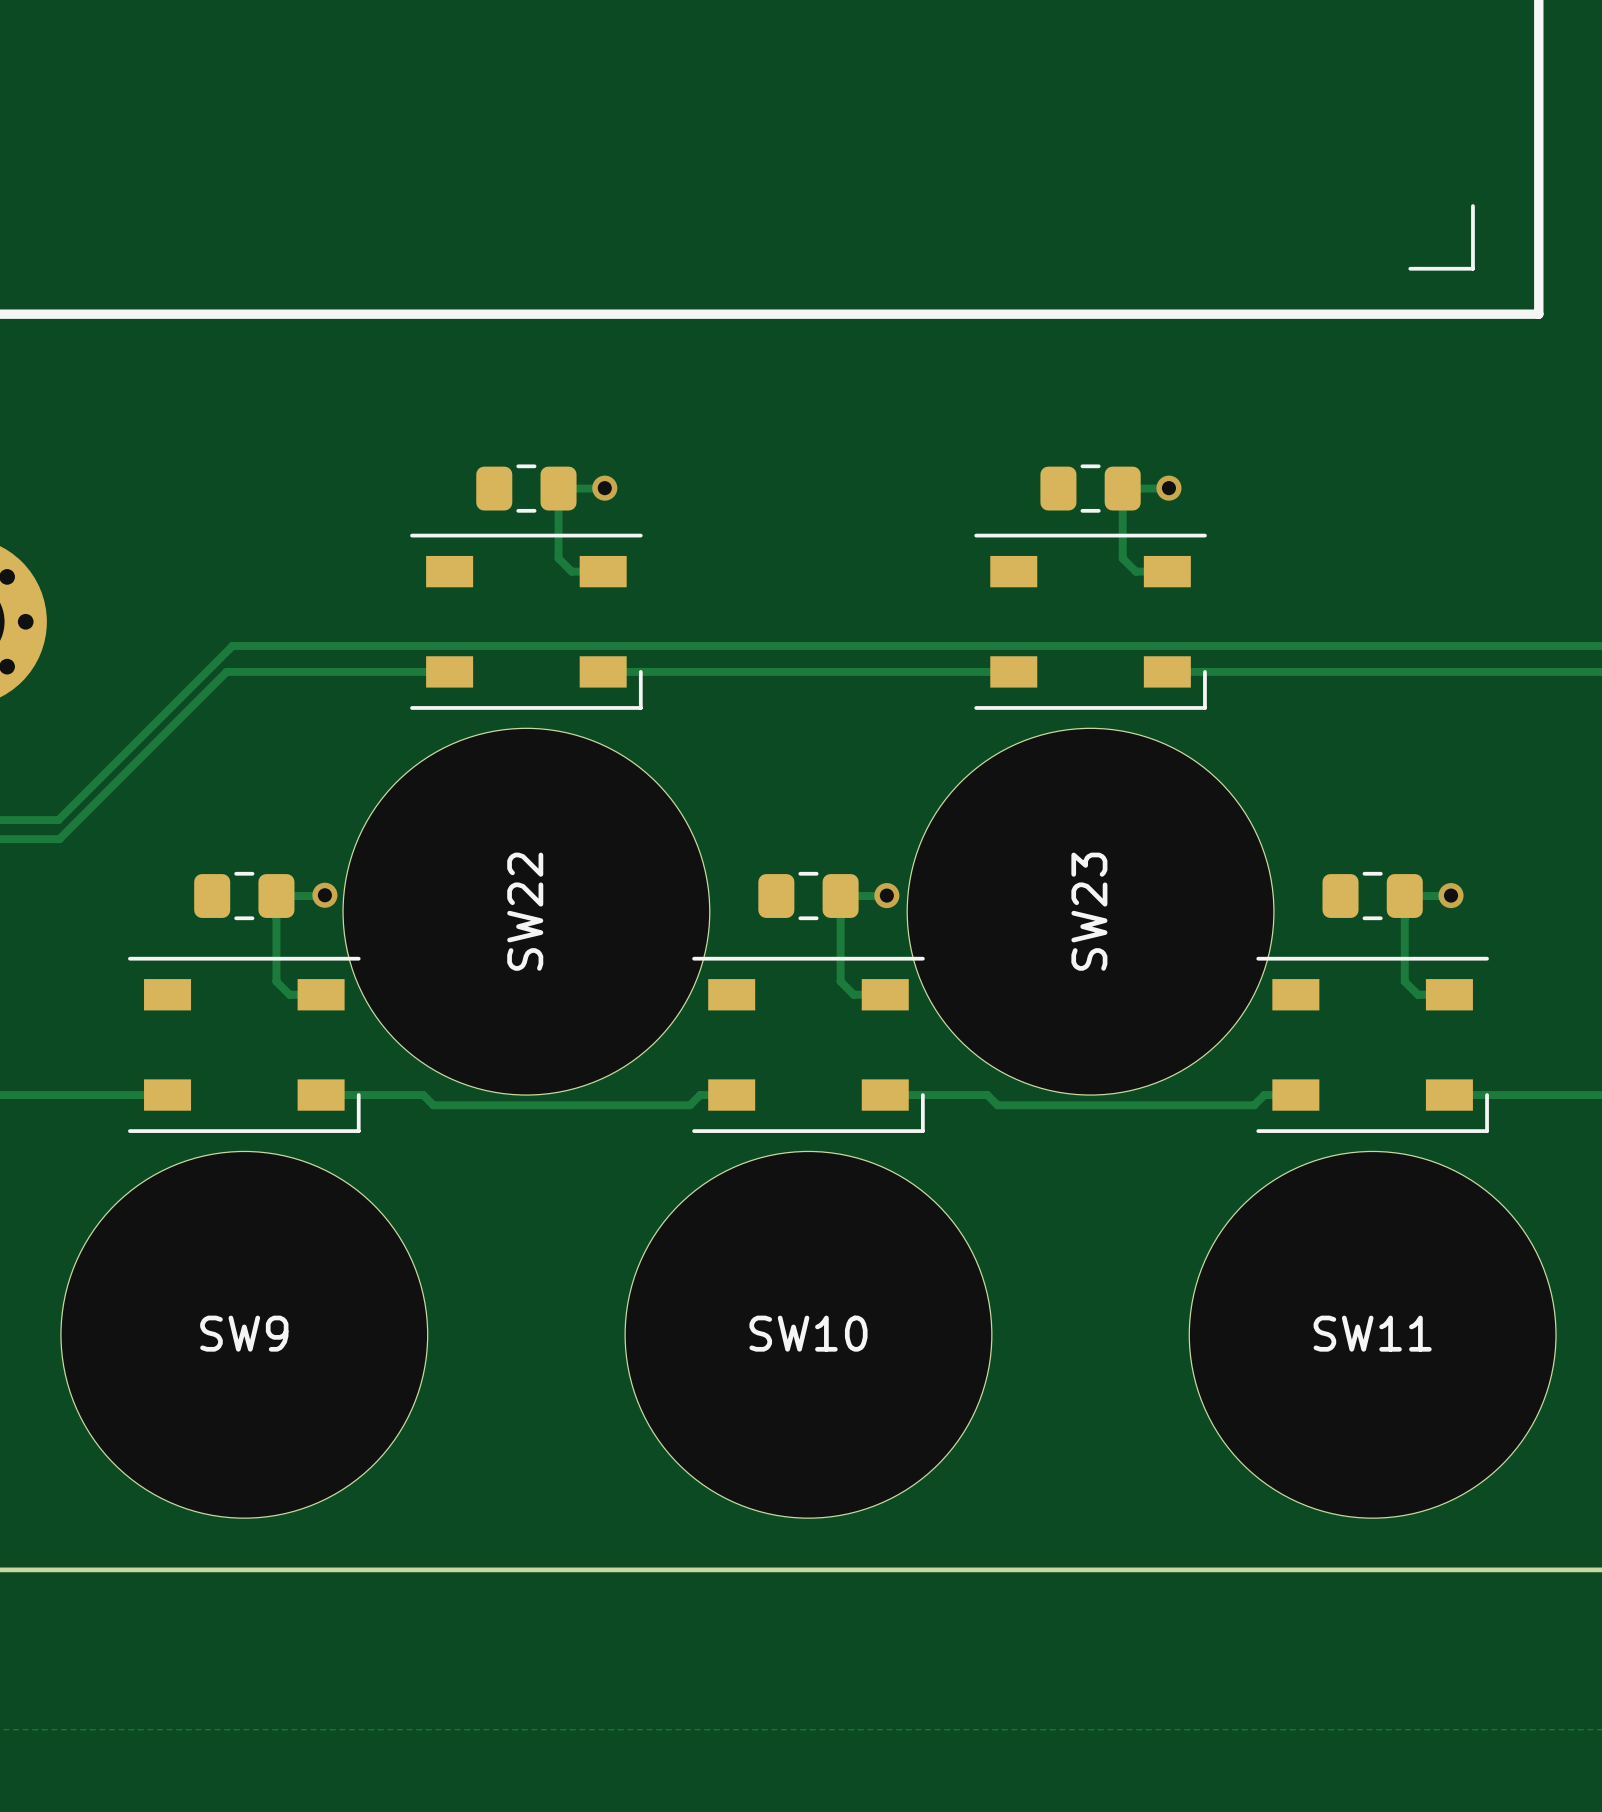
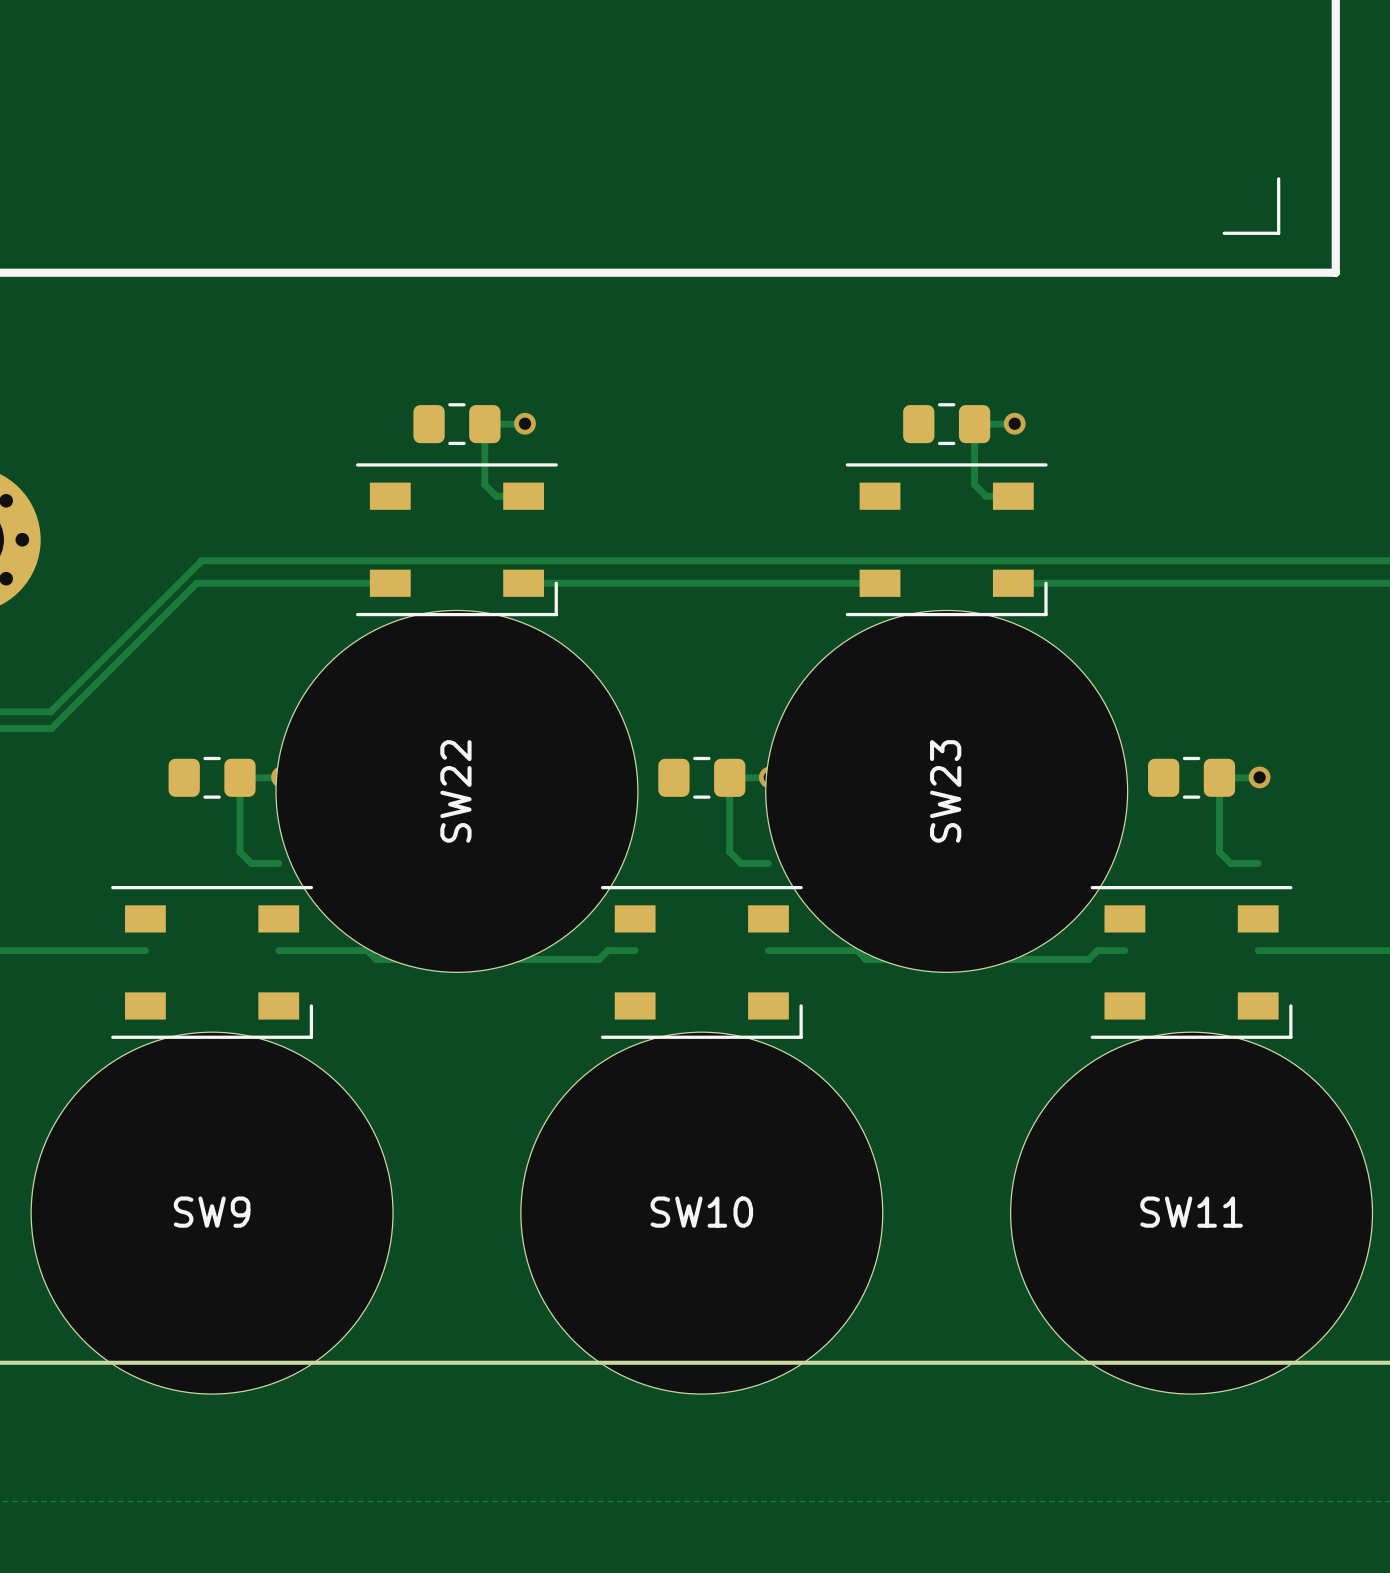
SW22 footprint: [343, 728, 710, 1096] -> [276, 610, 638, 973]
SW23 footprint: [907, 728, 1274, 1096] -> [765, 610, 1128, 973]
part position: (244, 1044) -> (212, 962)
part position: (808, 1044) -> (701, 962)
part position: (1372, 1044) -> (1191, 962)
SW9 footprint: [60, 1151, 428, 1519] -> [31, 1032, 394, 1395]
SW10 footprint: [625, 1151, 992, 1519] -> [520, 1032, 883, 1395]
SW11 footprint: [1189, 1151, 1556, 1519] -> [1010, 1032, 1373, 1395]

